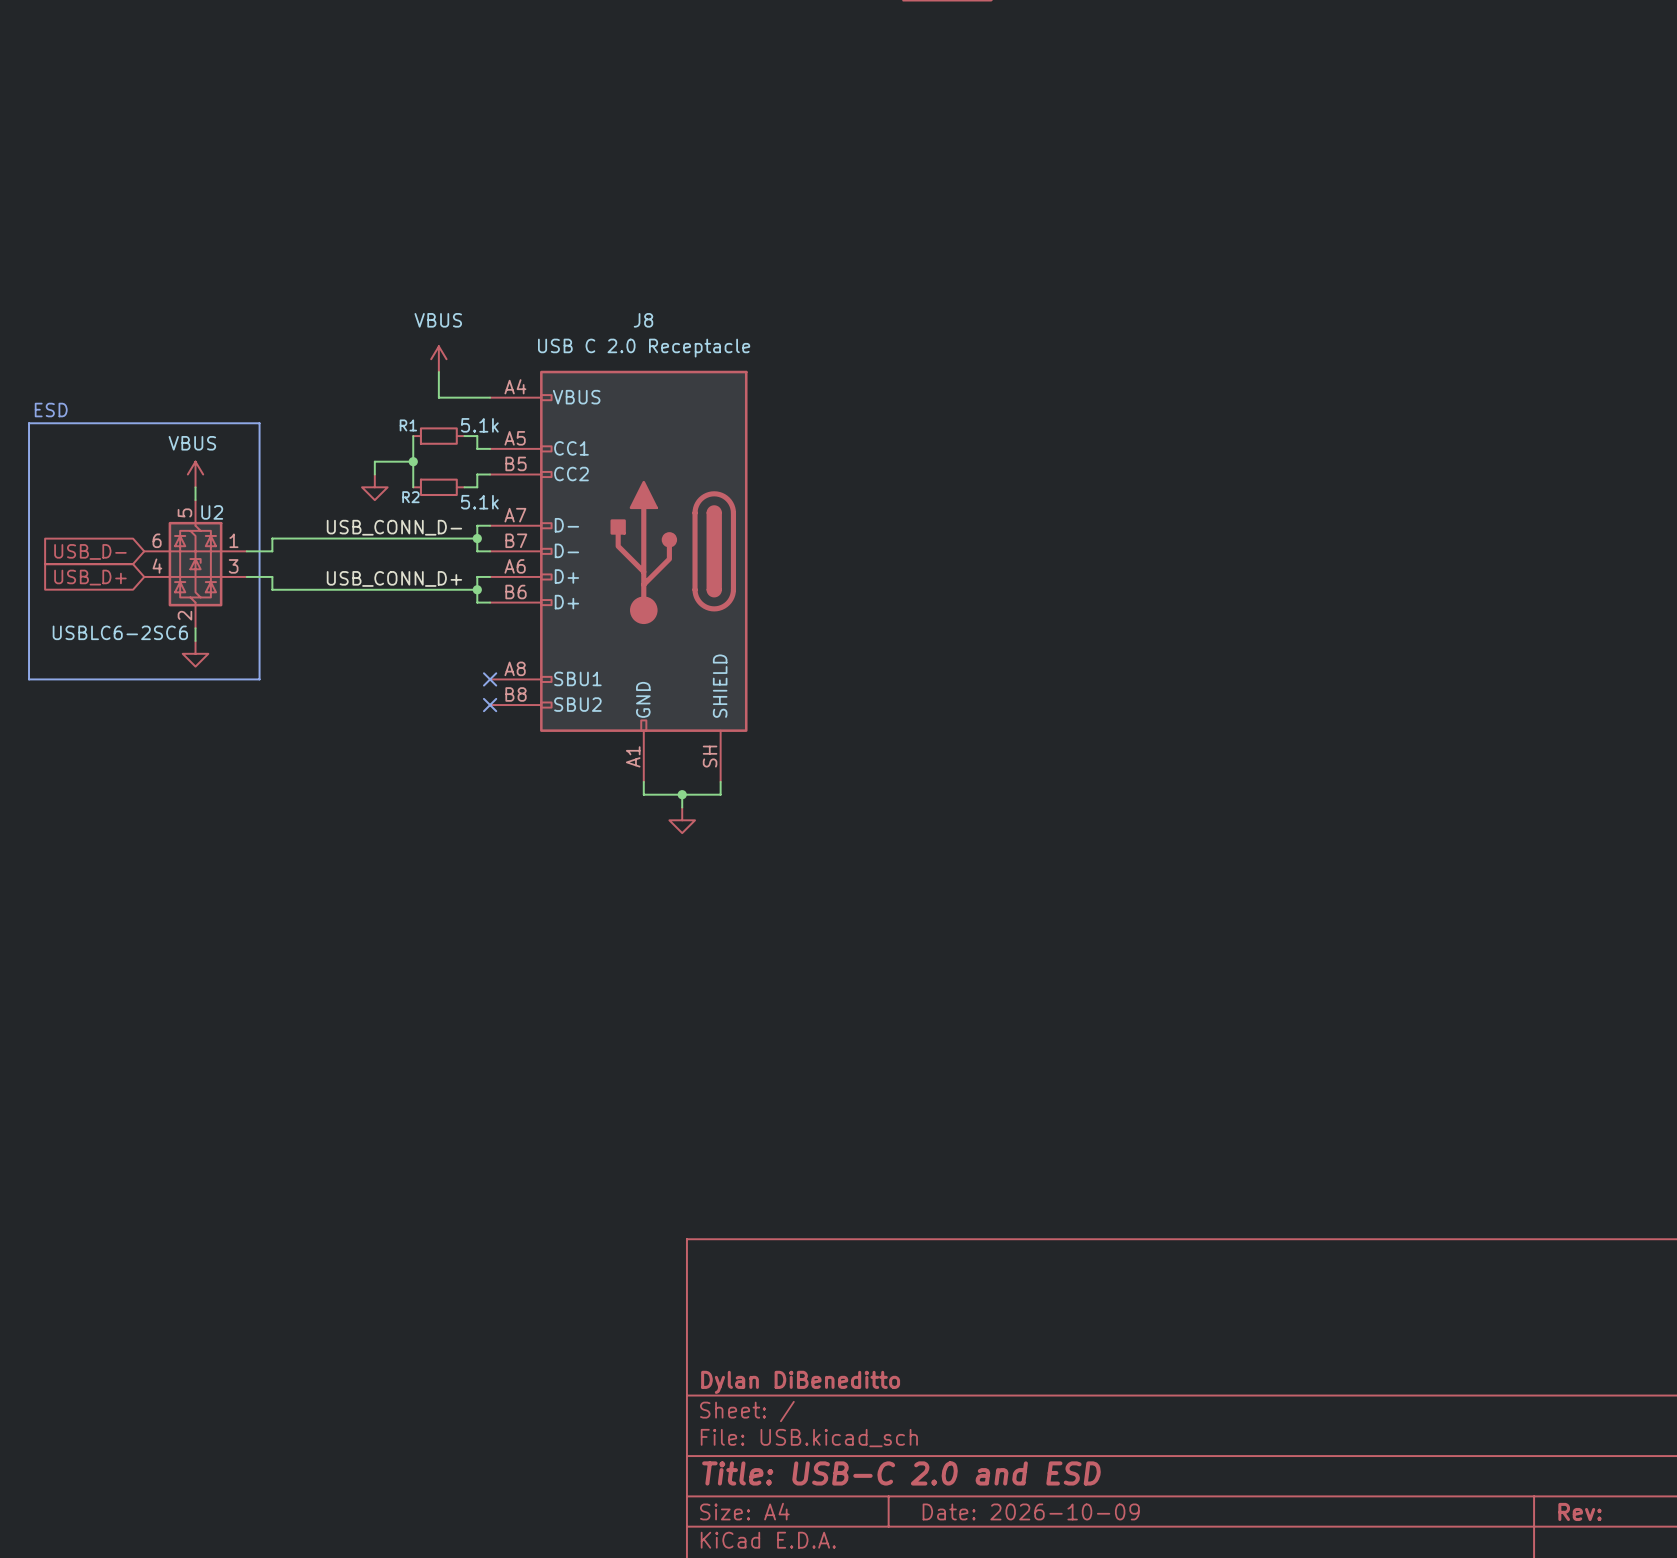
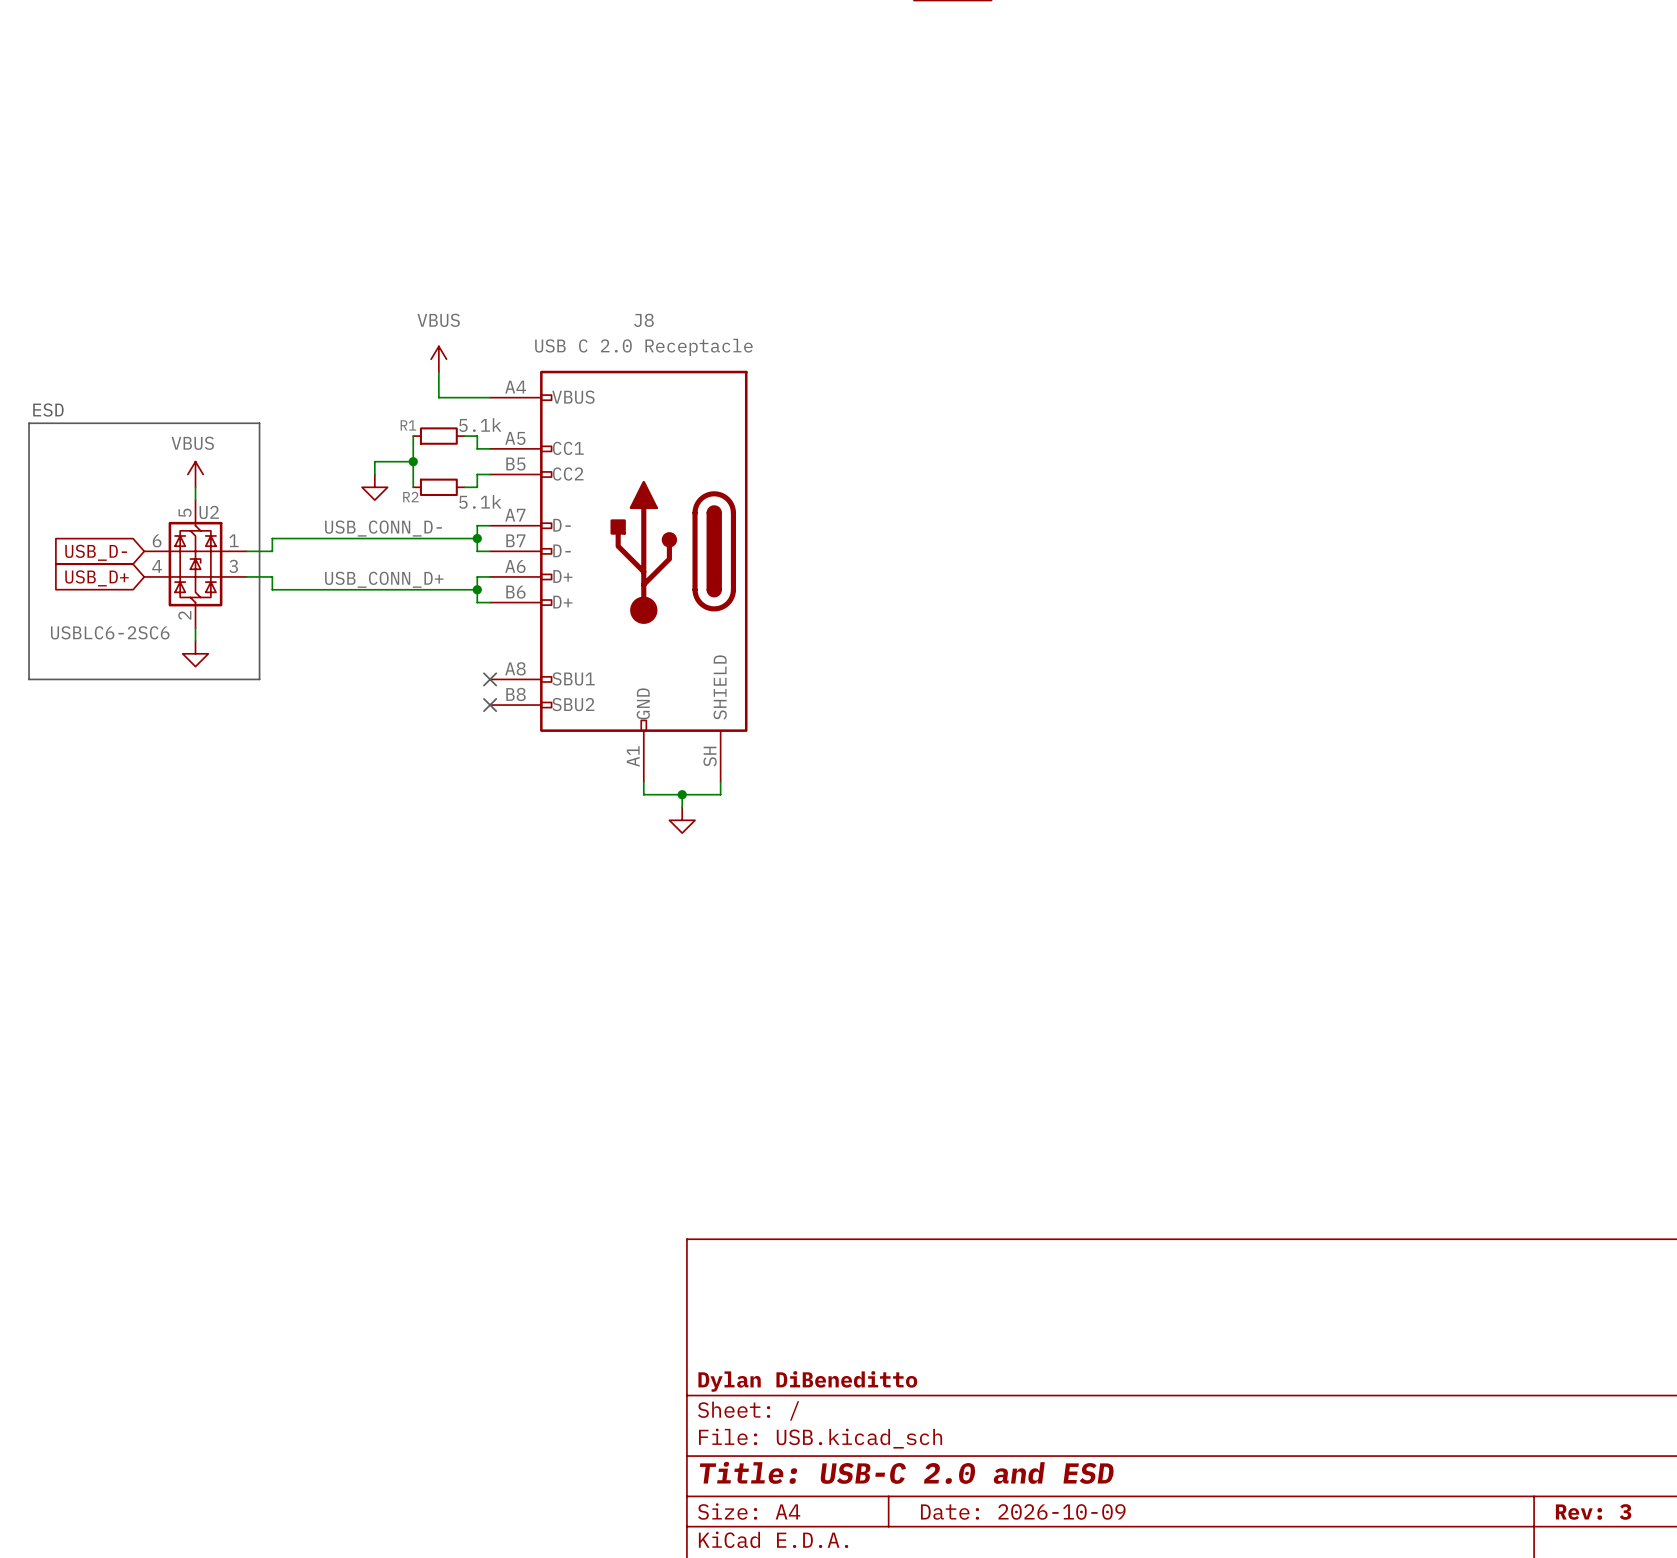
title block: Rev: (1580, 1511) -> Rev: 3 (1593, 1511)

